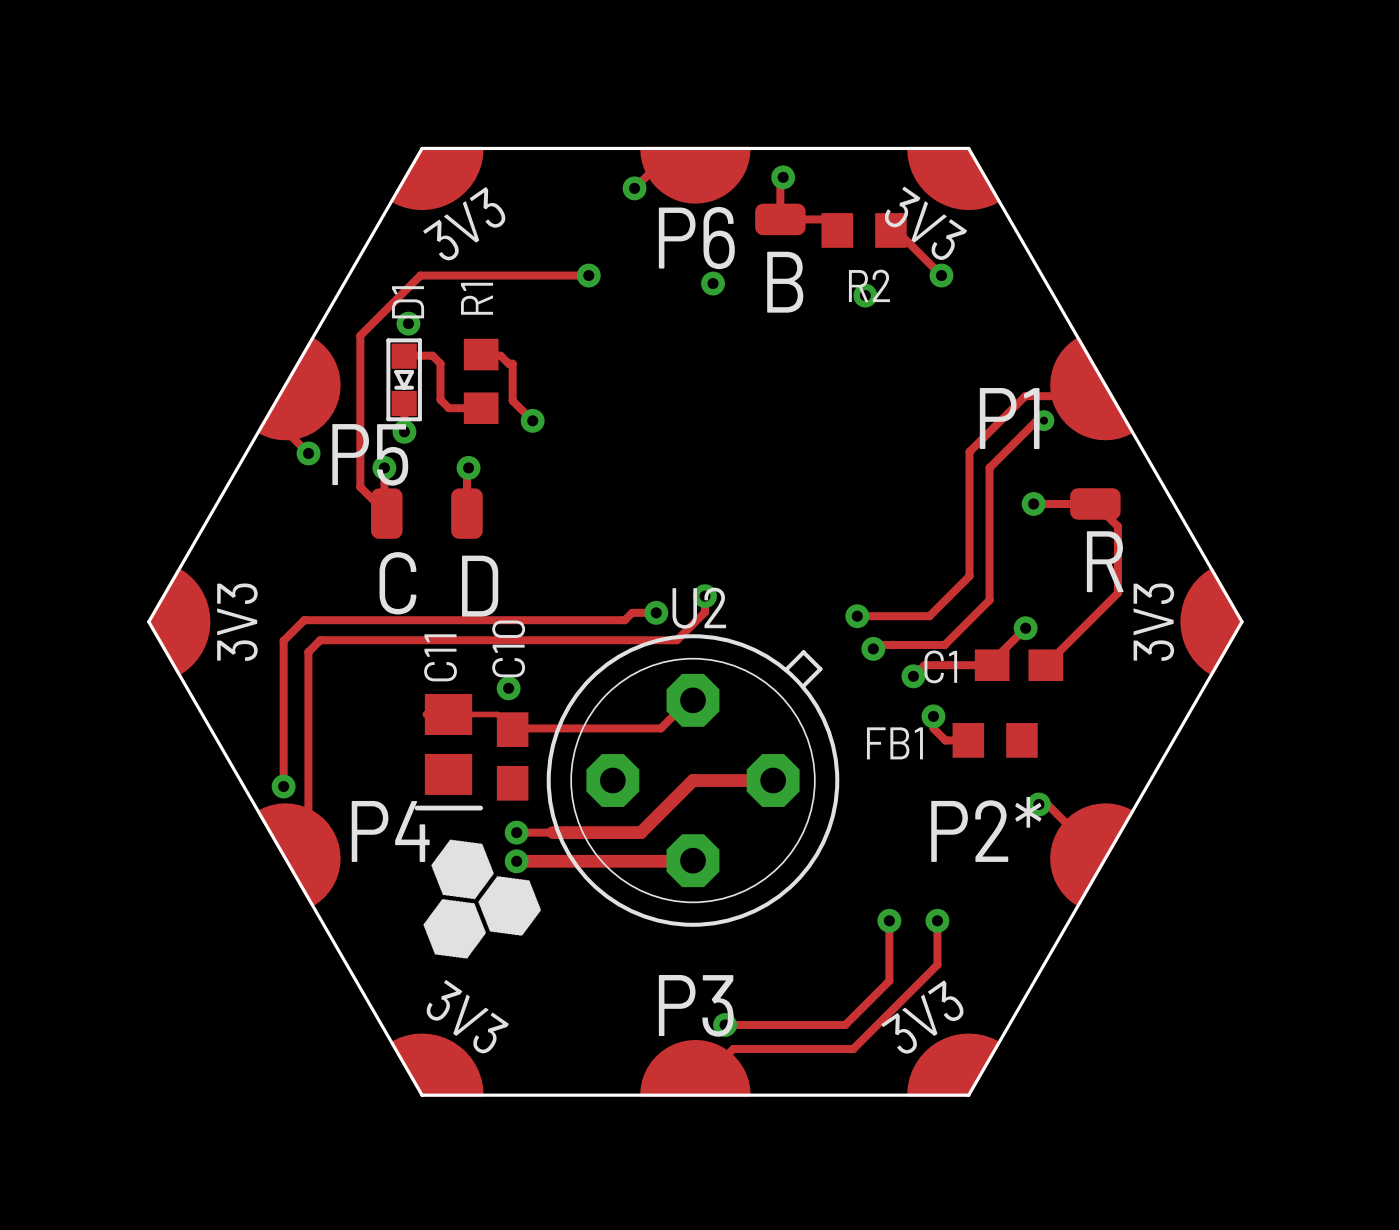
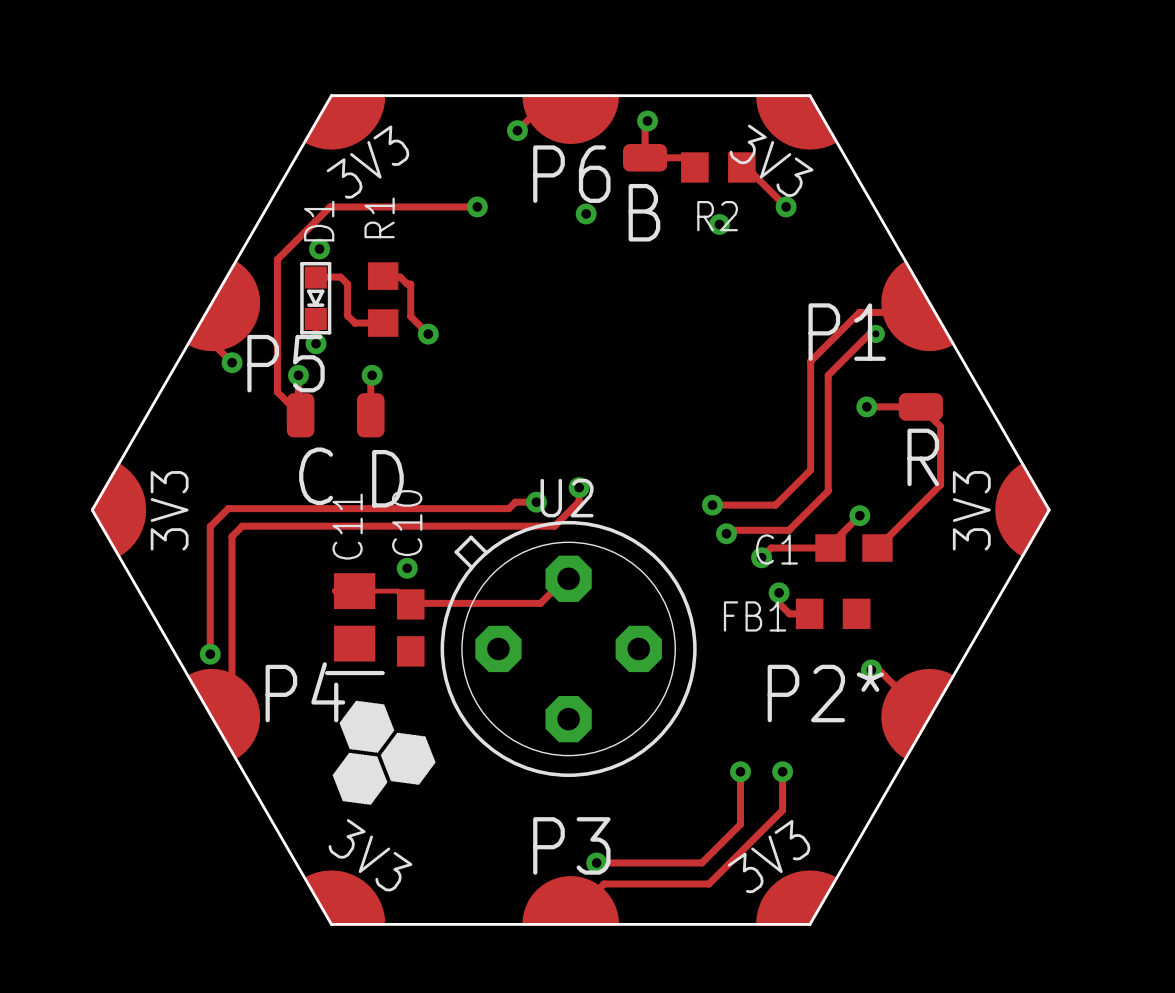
U2 rotation: 0° (692, 780) -> 90° counterclockwise (568, 648)
track: (773, 780) (692, 780) (640, 832) (516, 832) -> none
via: (516, 832) -> none
track: (692, 860) (516, 861) -> none
via: (516, 861) -> none

